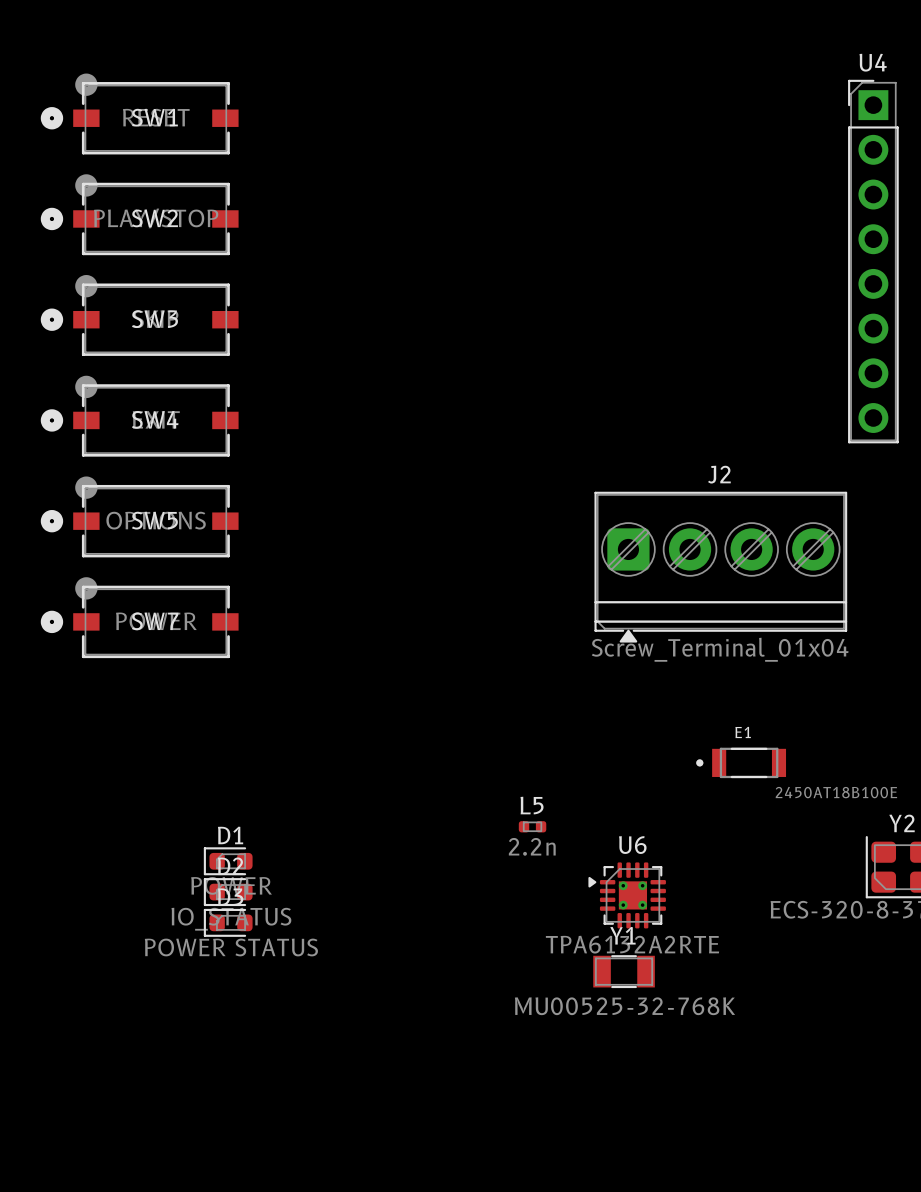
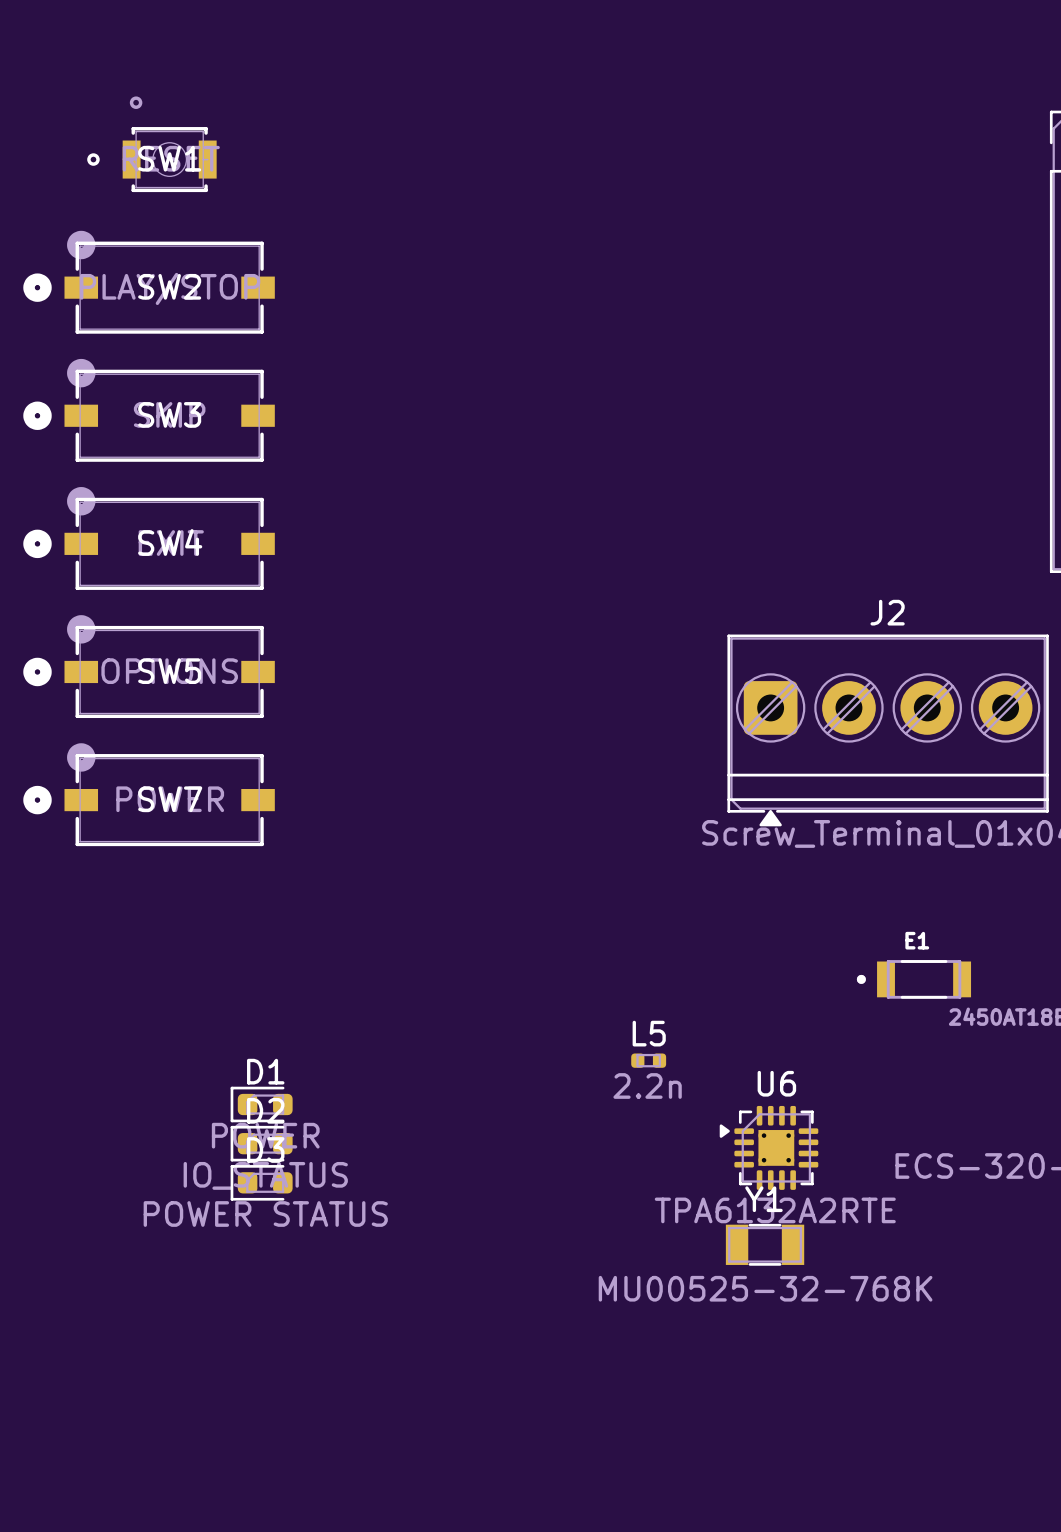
SW1 footprint: [40, 73, 239, 155] -> [87, 96, 217, 193]

